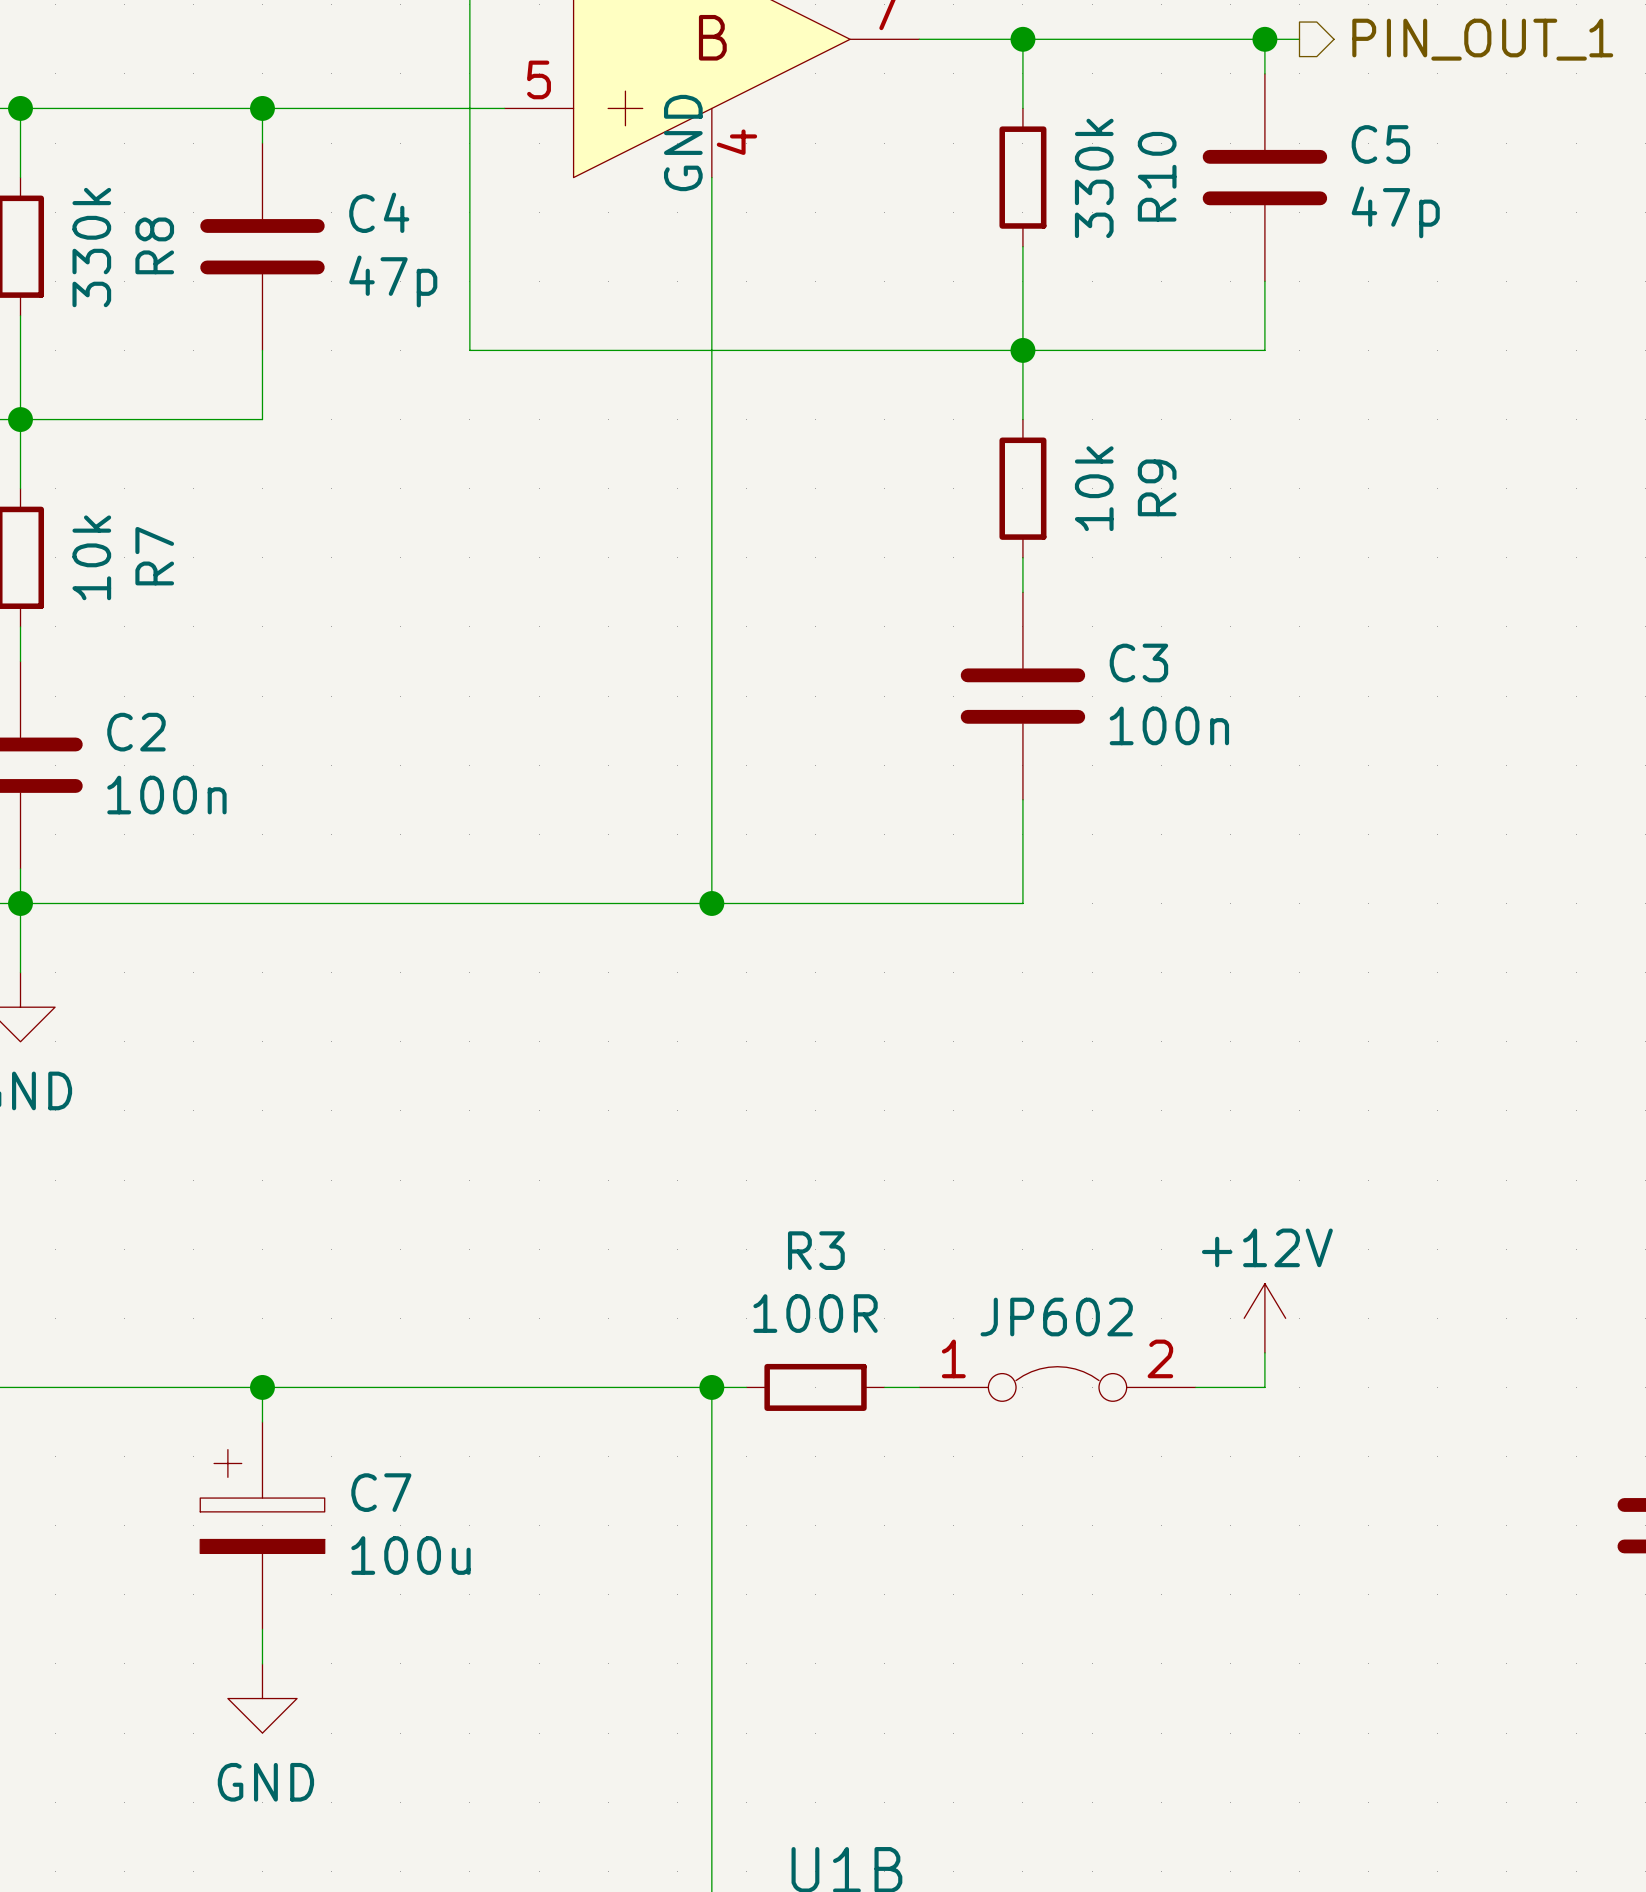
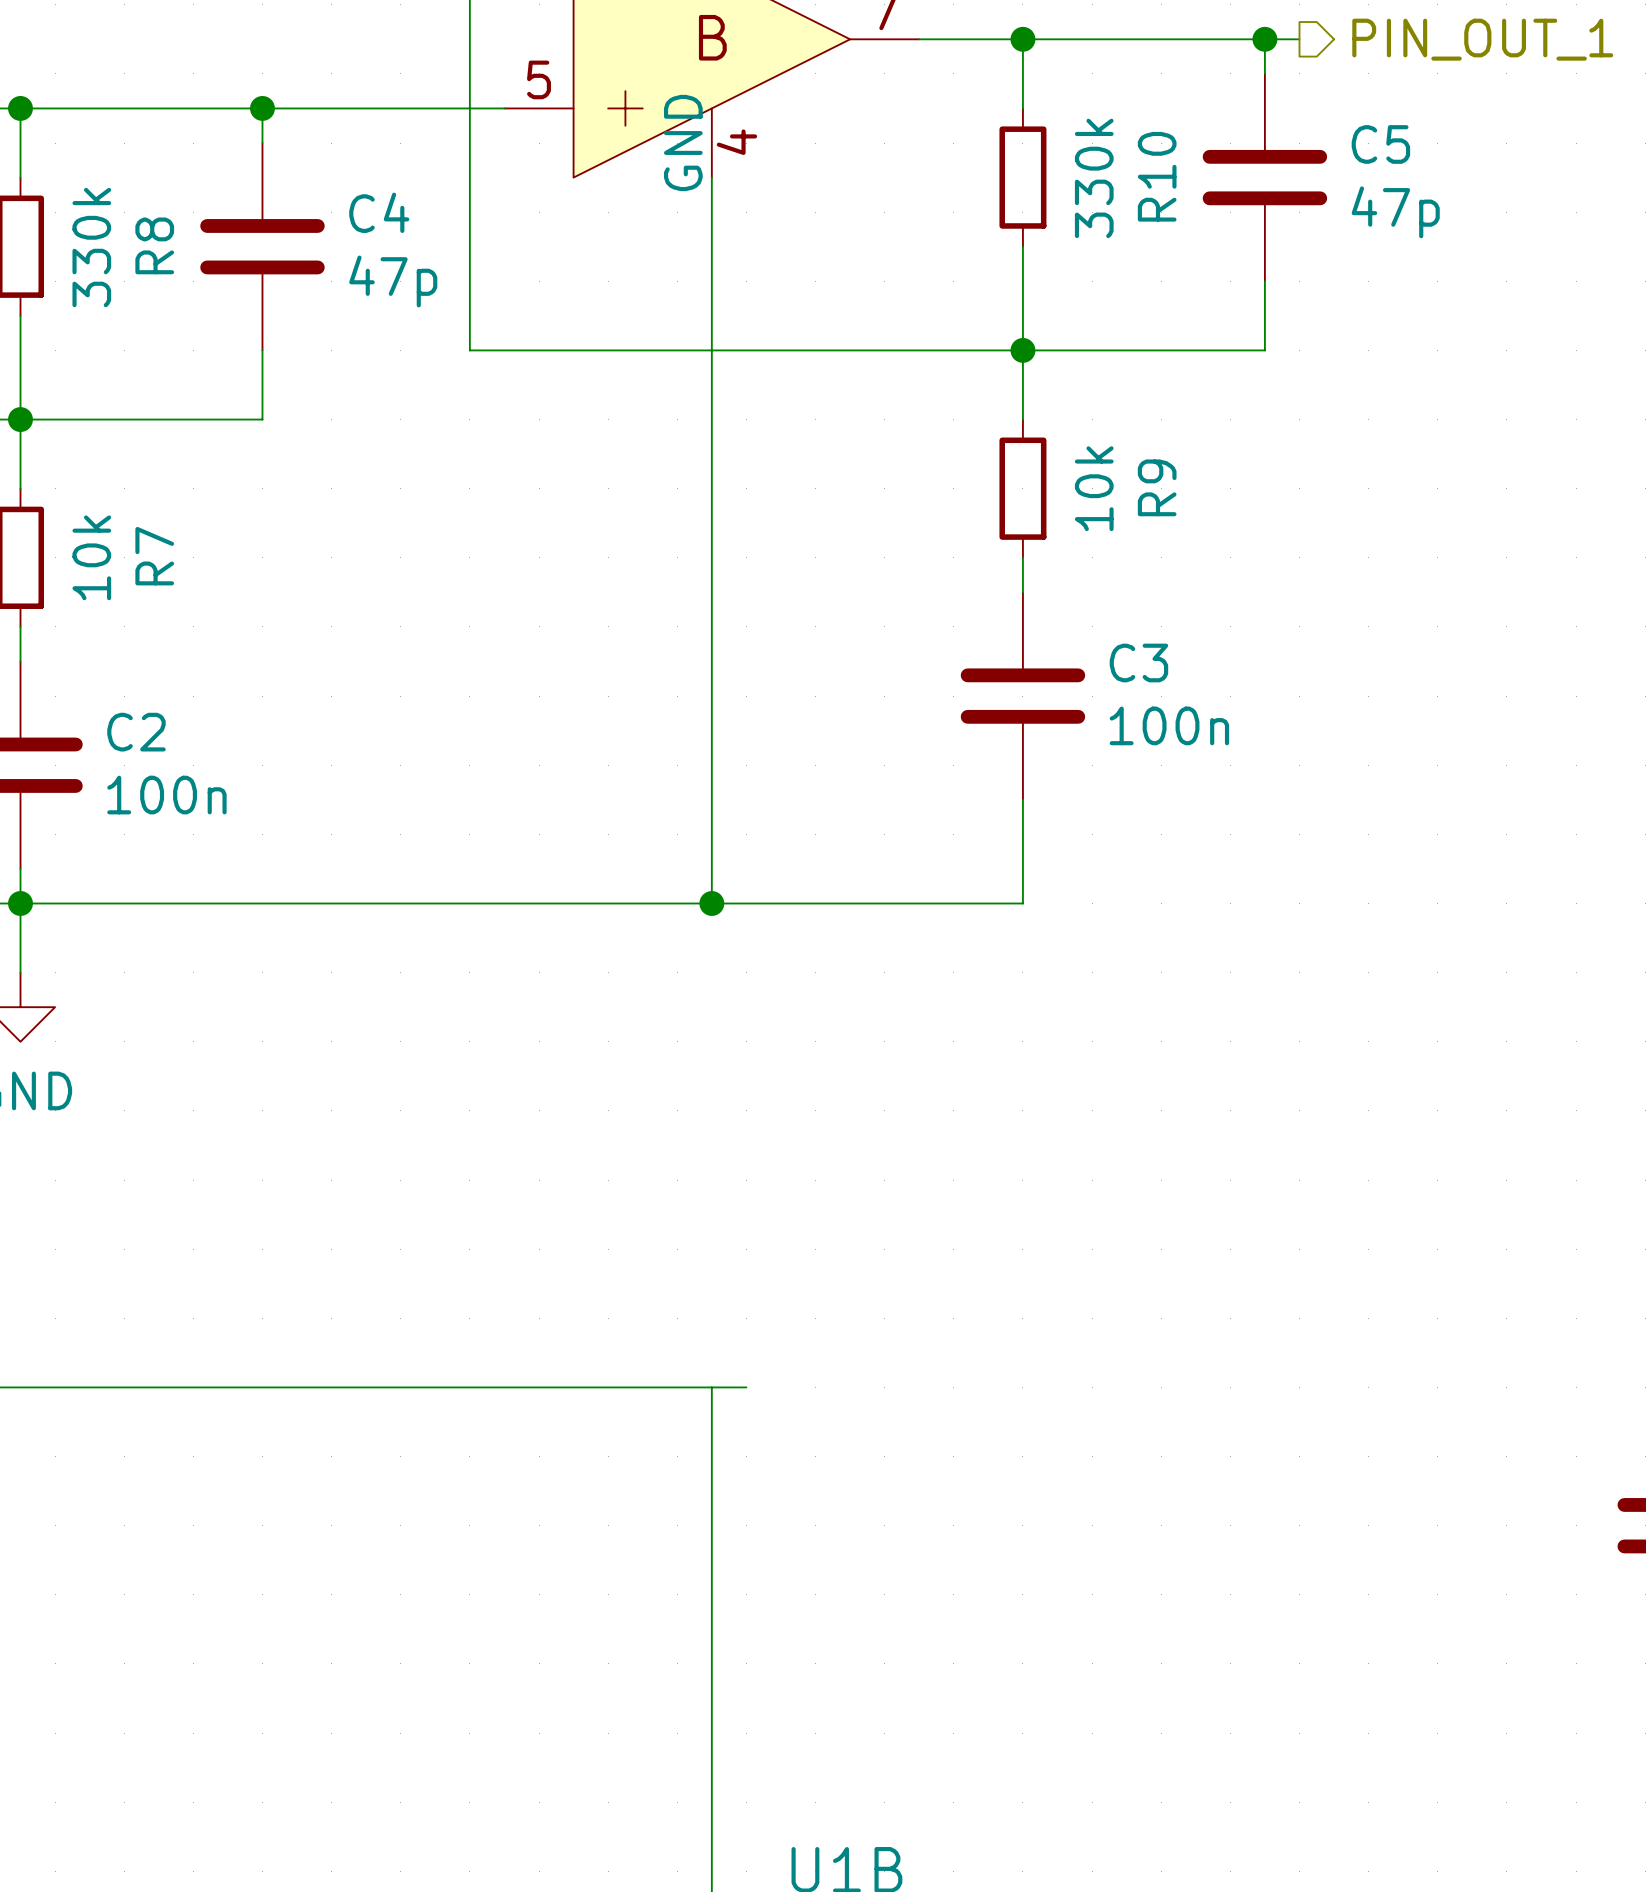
power symbol: +12V (1264, 1318) -> none
wire: (1264, 1352) (1264, 1387) (1195, 1387) -> none
JP602: (1057, 1383) -> none
wire: (262, 1387) (262, 1422) -> none
junction: (262, 1387) -> none
junction: (711, 1387) -> none
R3: 100R (815, 1387) -> none
wire: (884, 1387) (919, 1387) -> none
C7: 100u (262, 1525) -> none
wire: (262, 1629) (262, 1663) -> none
power symbol: GND (262, 1698) -> none

